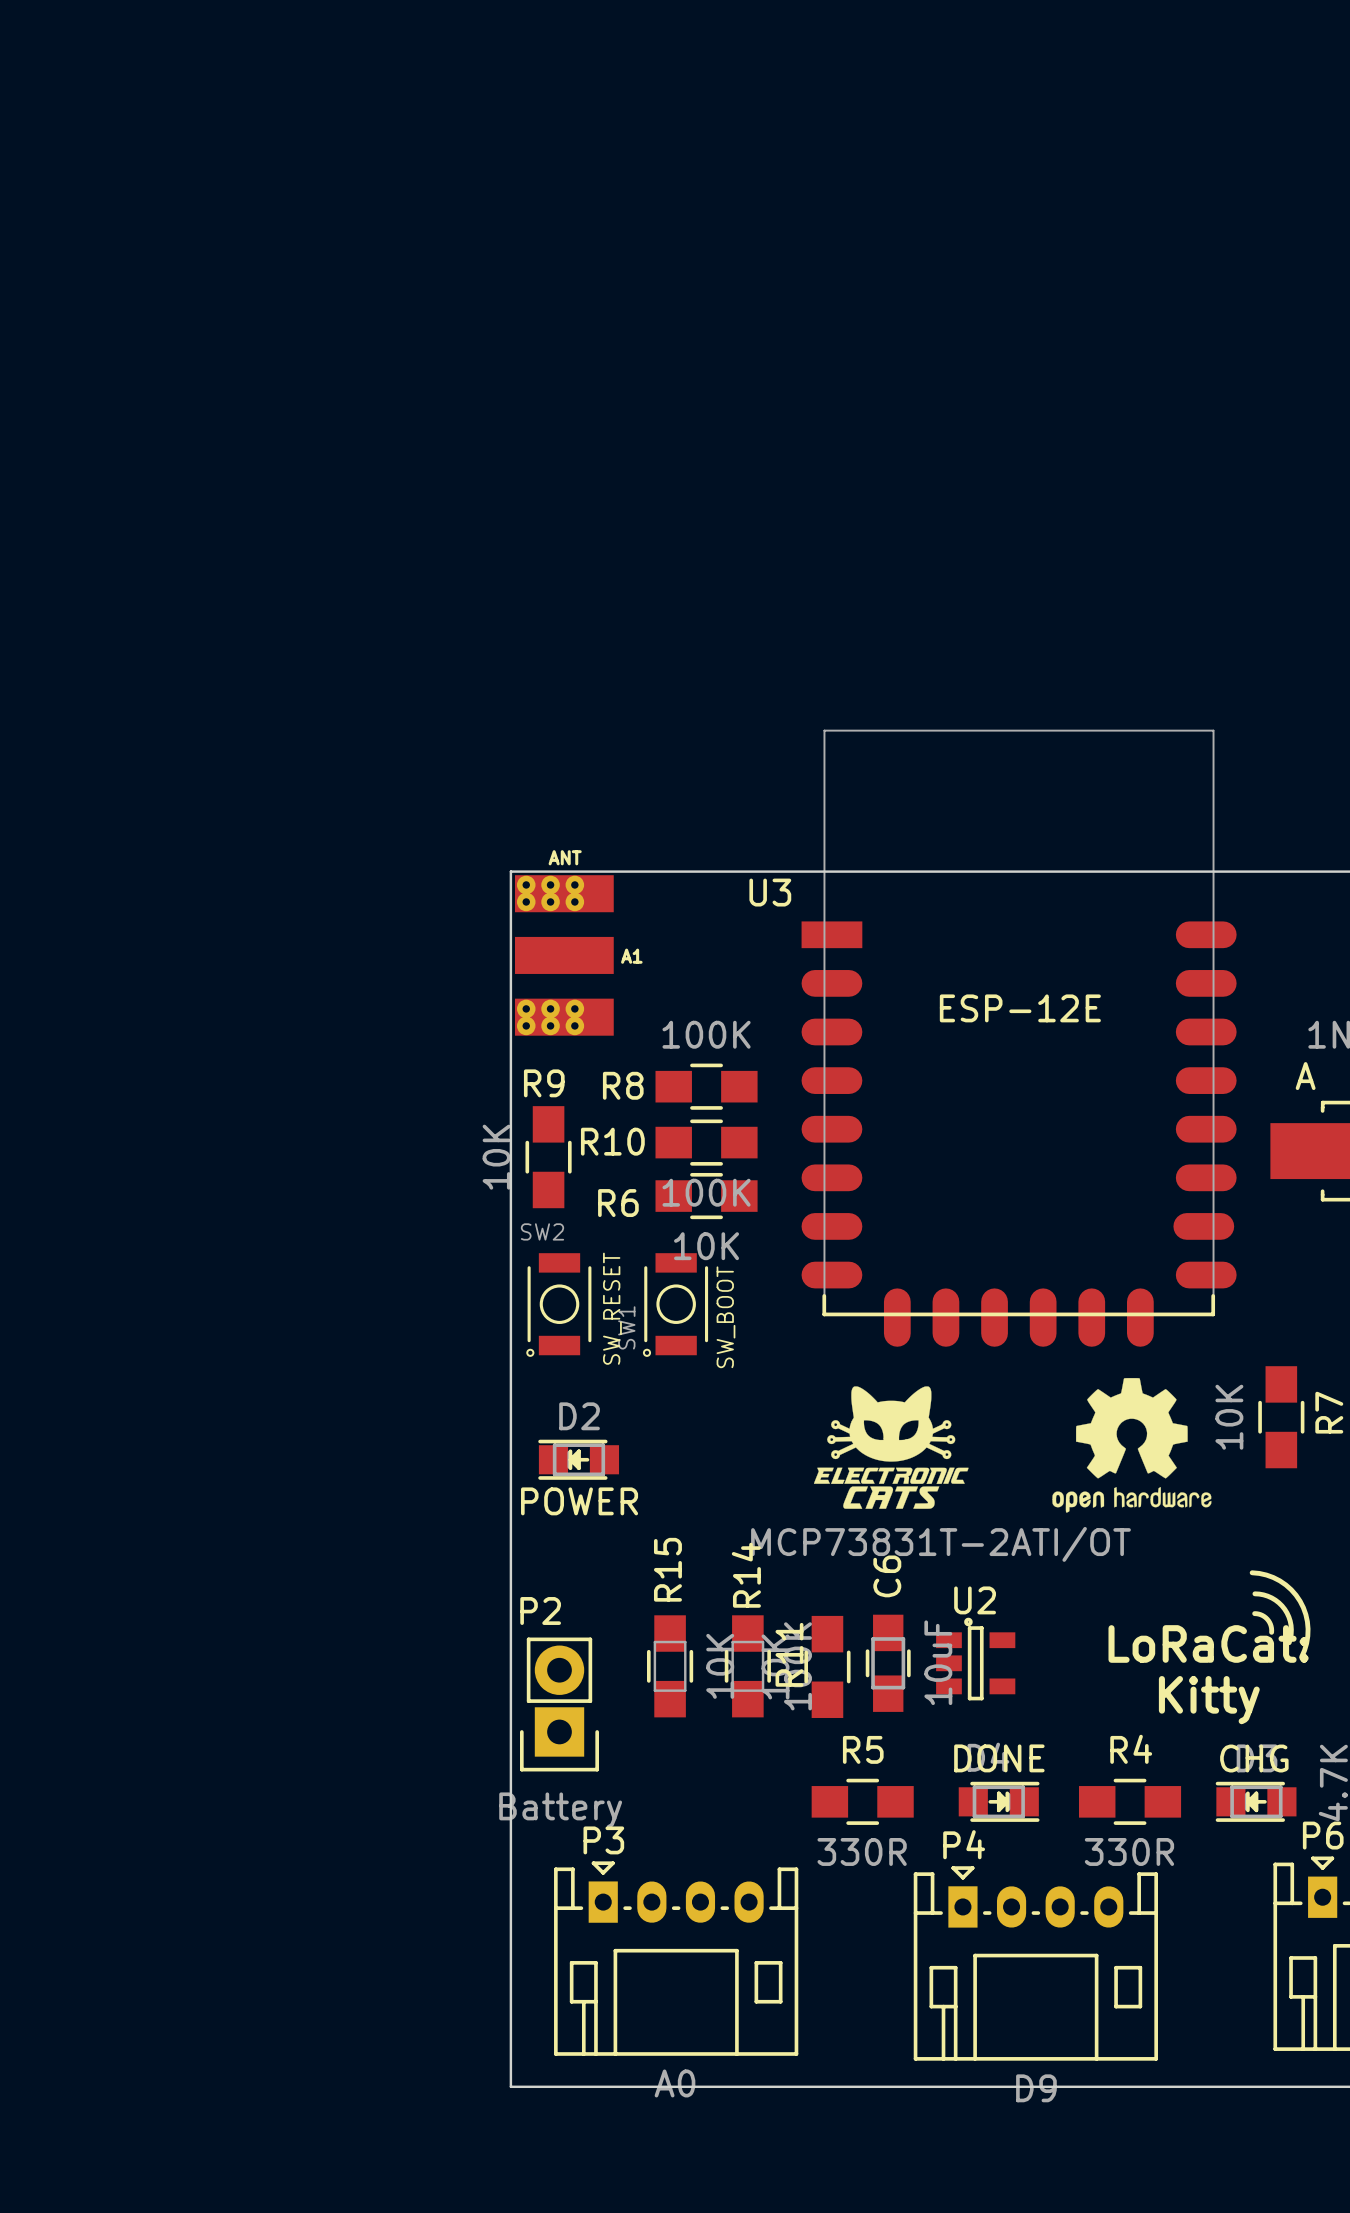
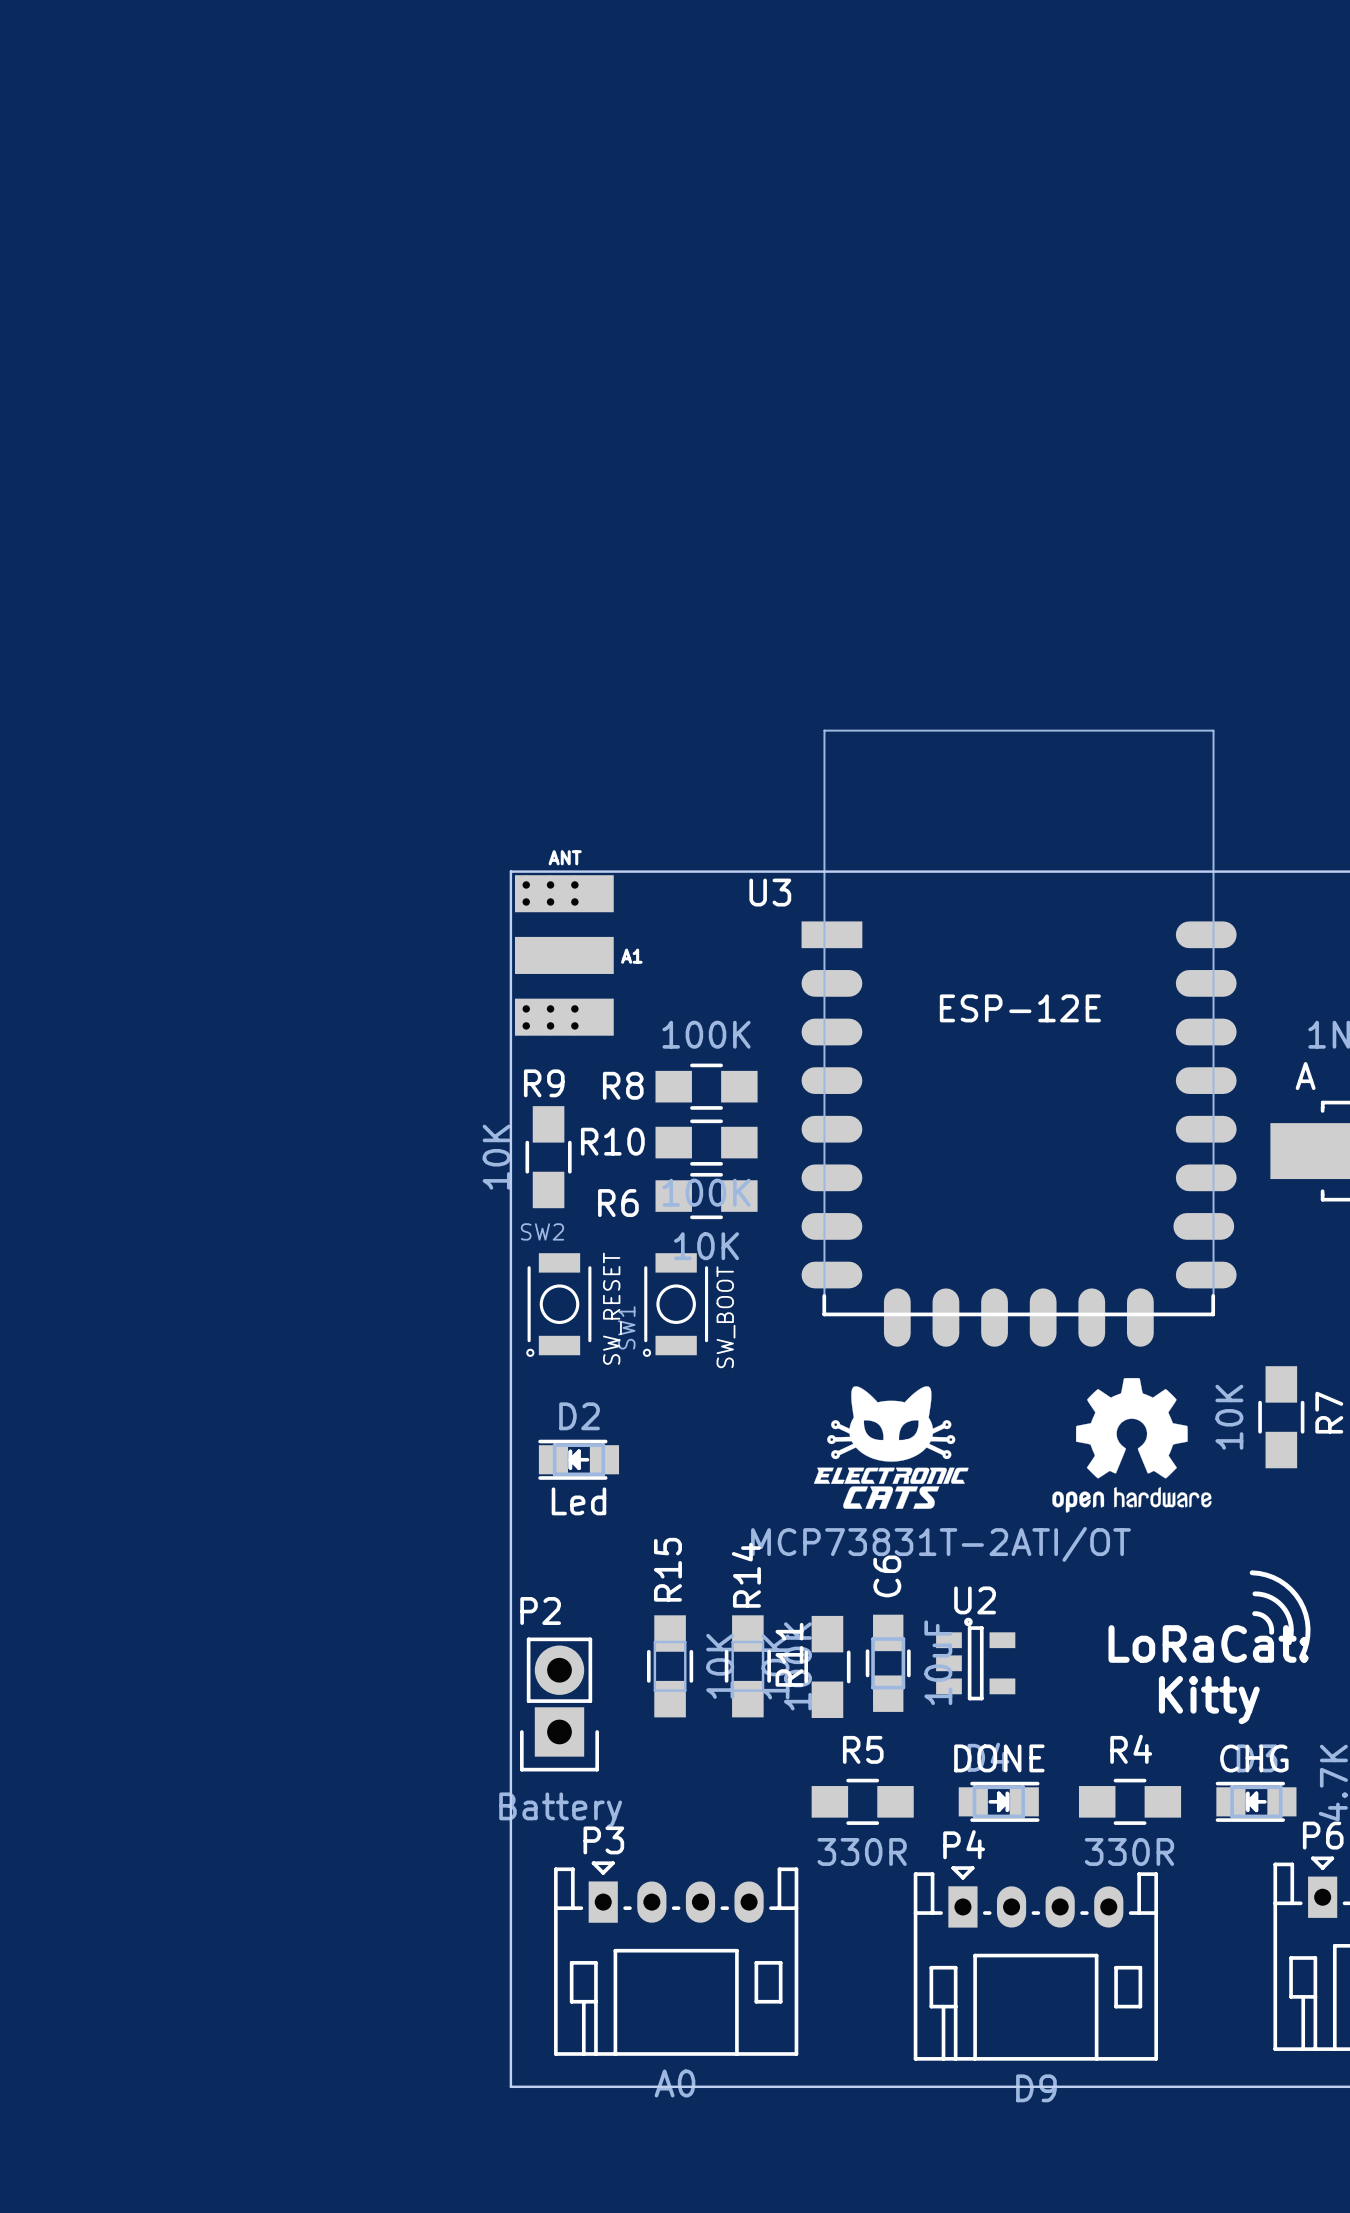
D2 value: POWER (579, 1501) -> Led (578, 1501)

